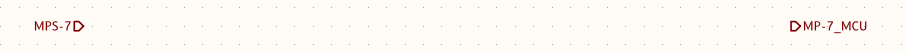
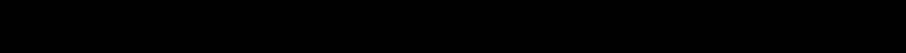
hierarchical label: MPS-7 (52, 25) -> none
hierarchical label: MP-7_MCU (835, 27) -> none

